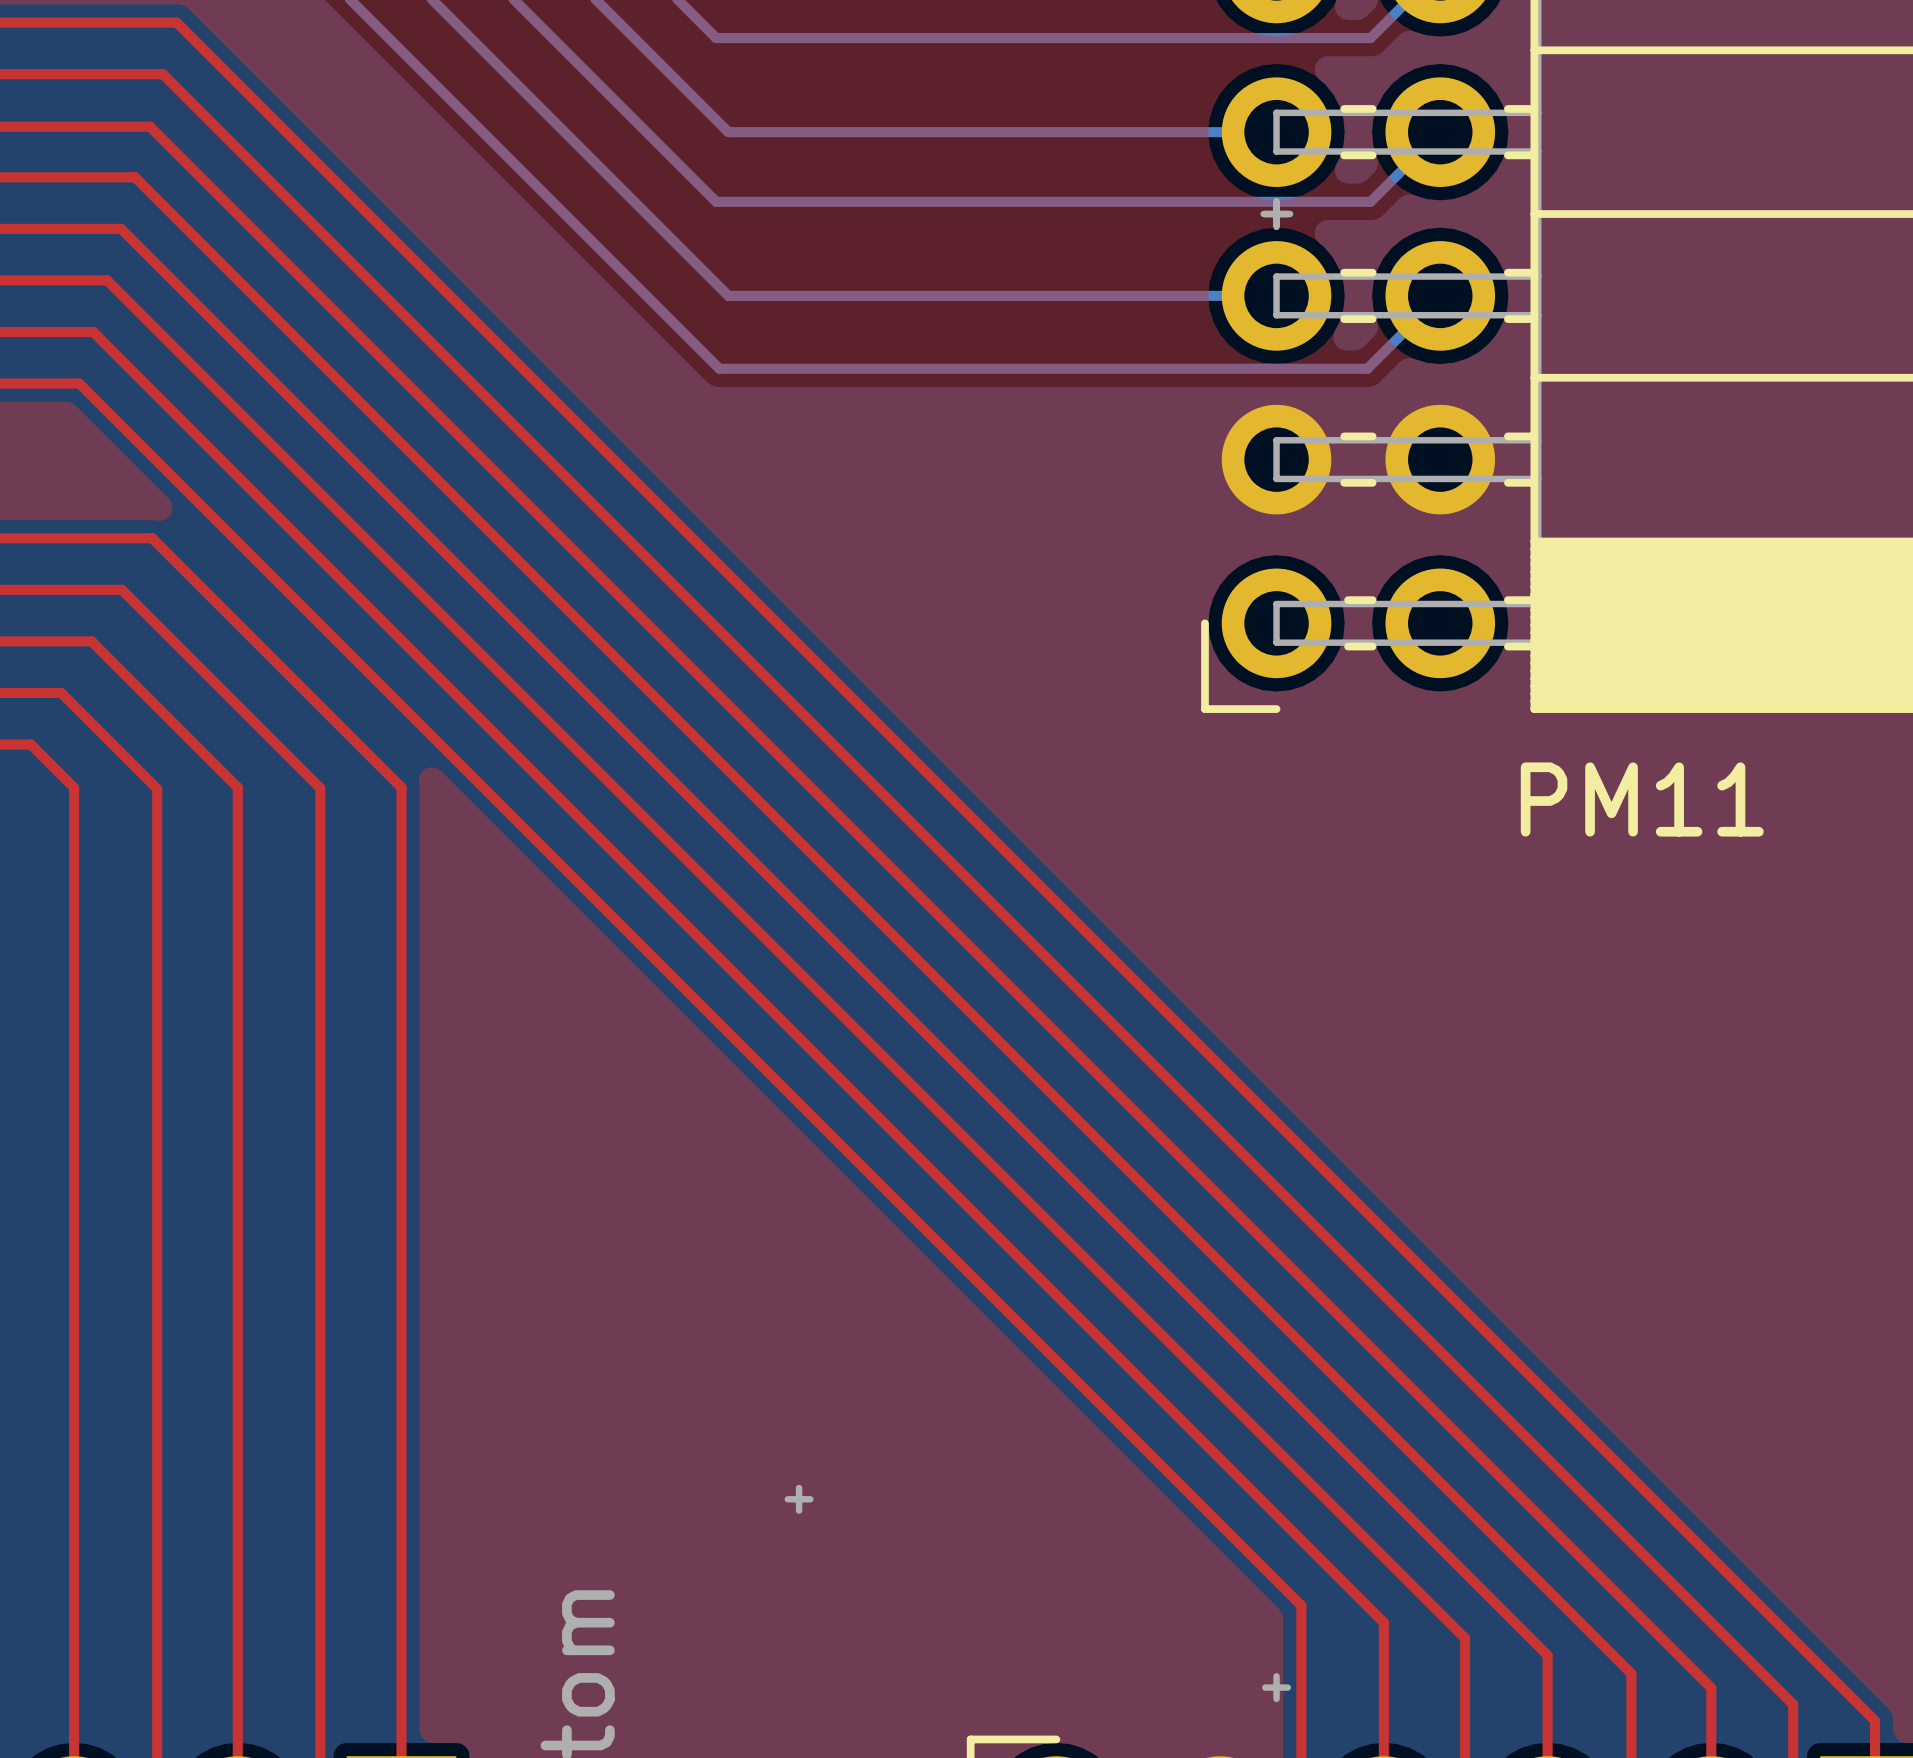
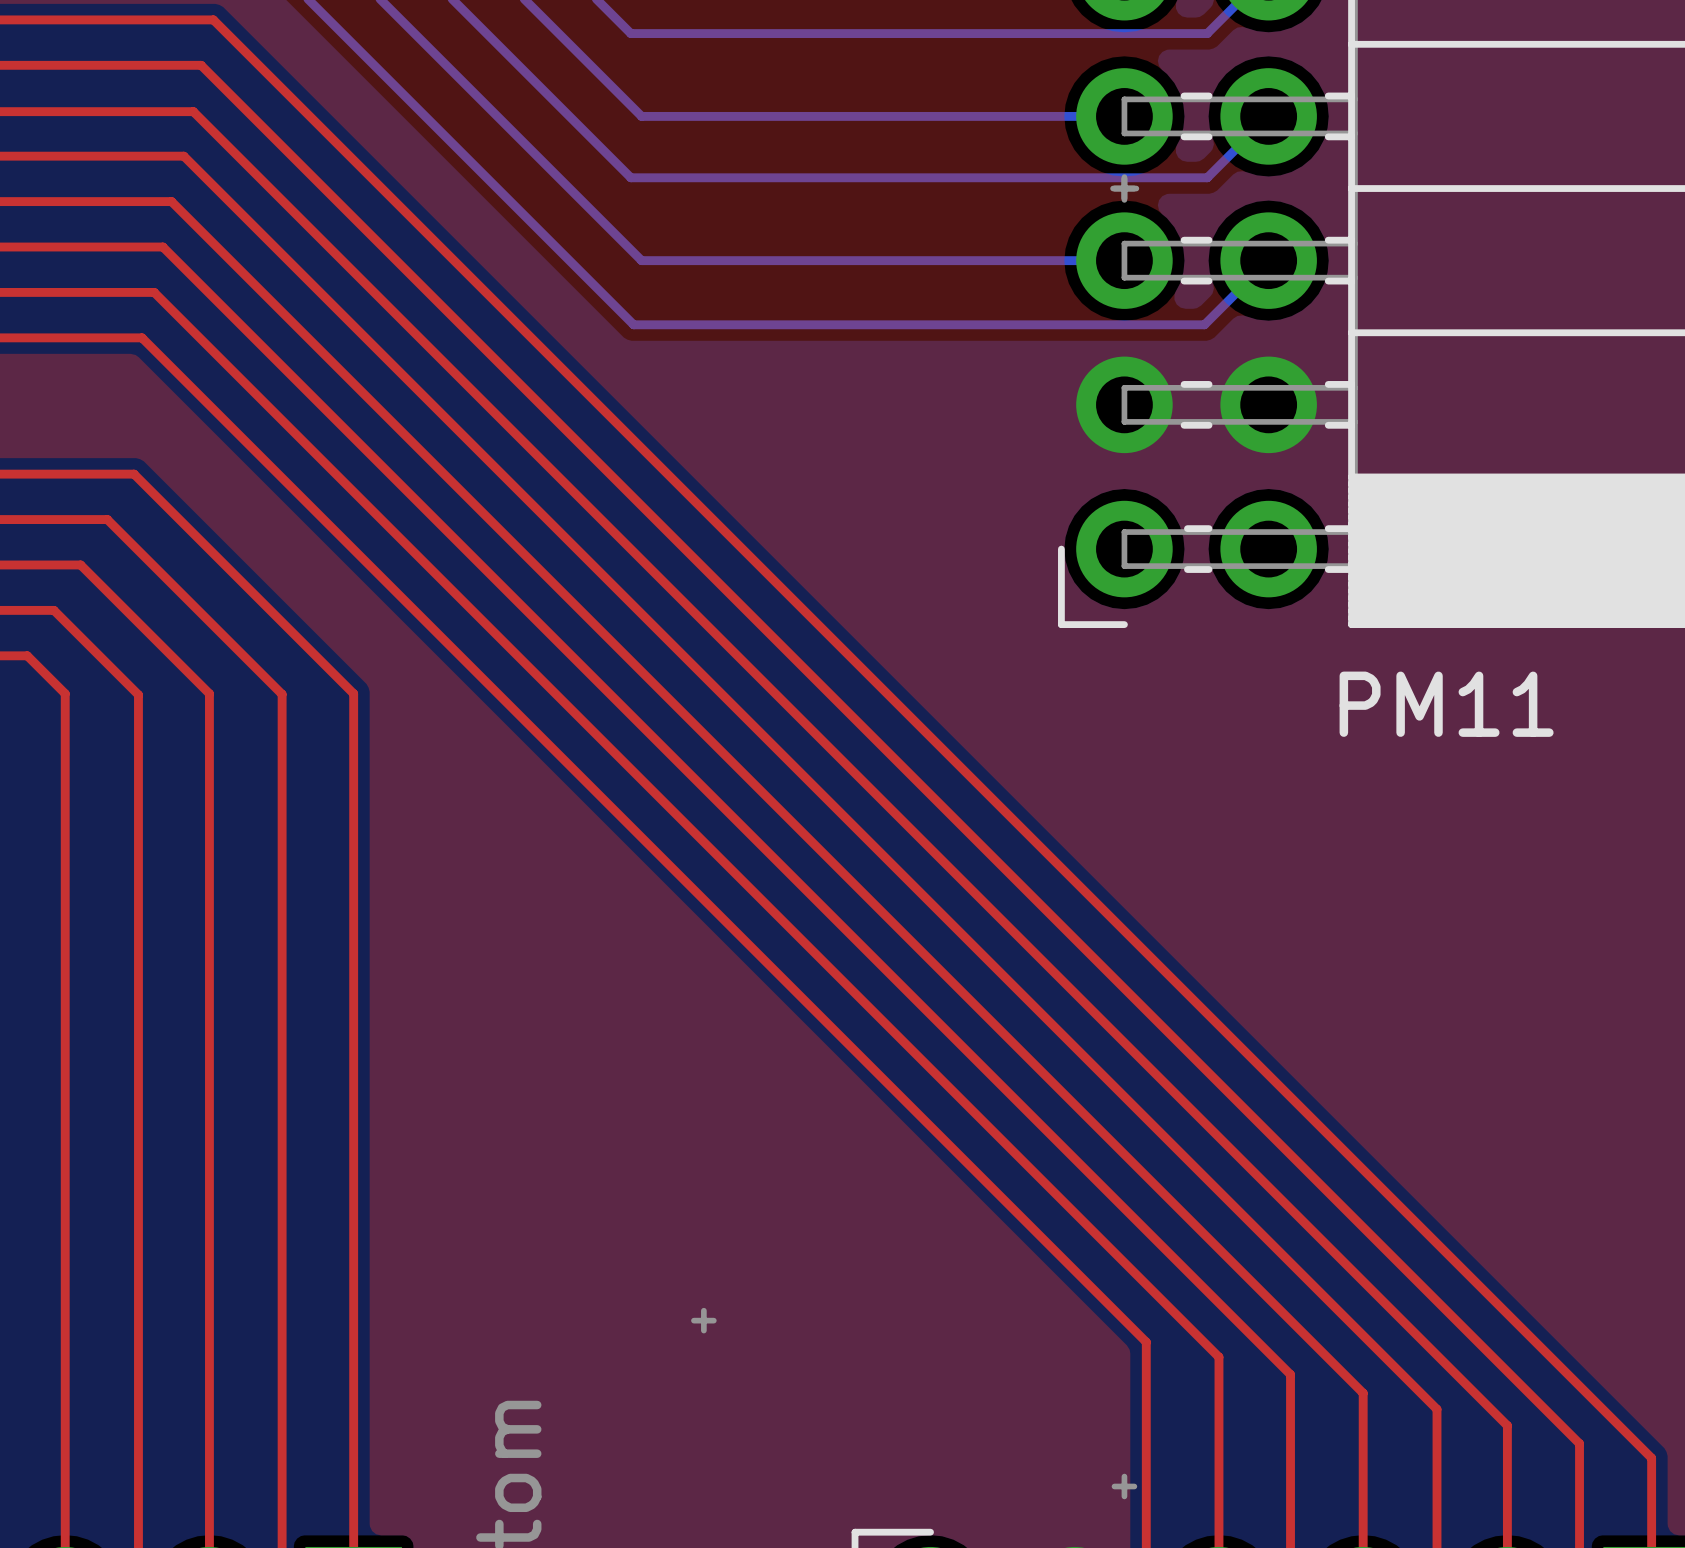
top track: (176, 22) (228, 74) -> (143, 65) (201, 65)
top track: none -> (155, 19) (213, 19) (1651, 1458) (1651, 1515)
top track: (162, 74) (1793, 1704) -> none
top track: (149, 126) (1711, 1688) -> (132, 111) (193, 111) (1507, 1425) (1507, 1486)
top track: (135, 177) (1631, 1673) -> (118, 156) (183, 156) (1437, 1409) (1437, 1474)
top track: (121, 228) (1547, 1655) -> (106, 201) (171, 201) (1363, 1393) (1363, 1458)
top track: (107, 280) (1465, 1638) -> (94, 247) (162, 247) (1290, 1374) (1290, 1443)
top track: (93, 331) (1383, 1622) -> (82, 292) (154, 292) (1218, 1357) (1218, 1429)
top track: (79, 383) (1301, 1605) -> (69, 337) (141, 337) (1146, 1342) (1146, 1414)
top track: (1793, 1638) (1875, 1720) -> (1579, 1443) (1579, 1501)

